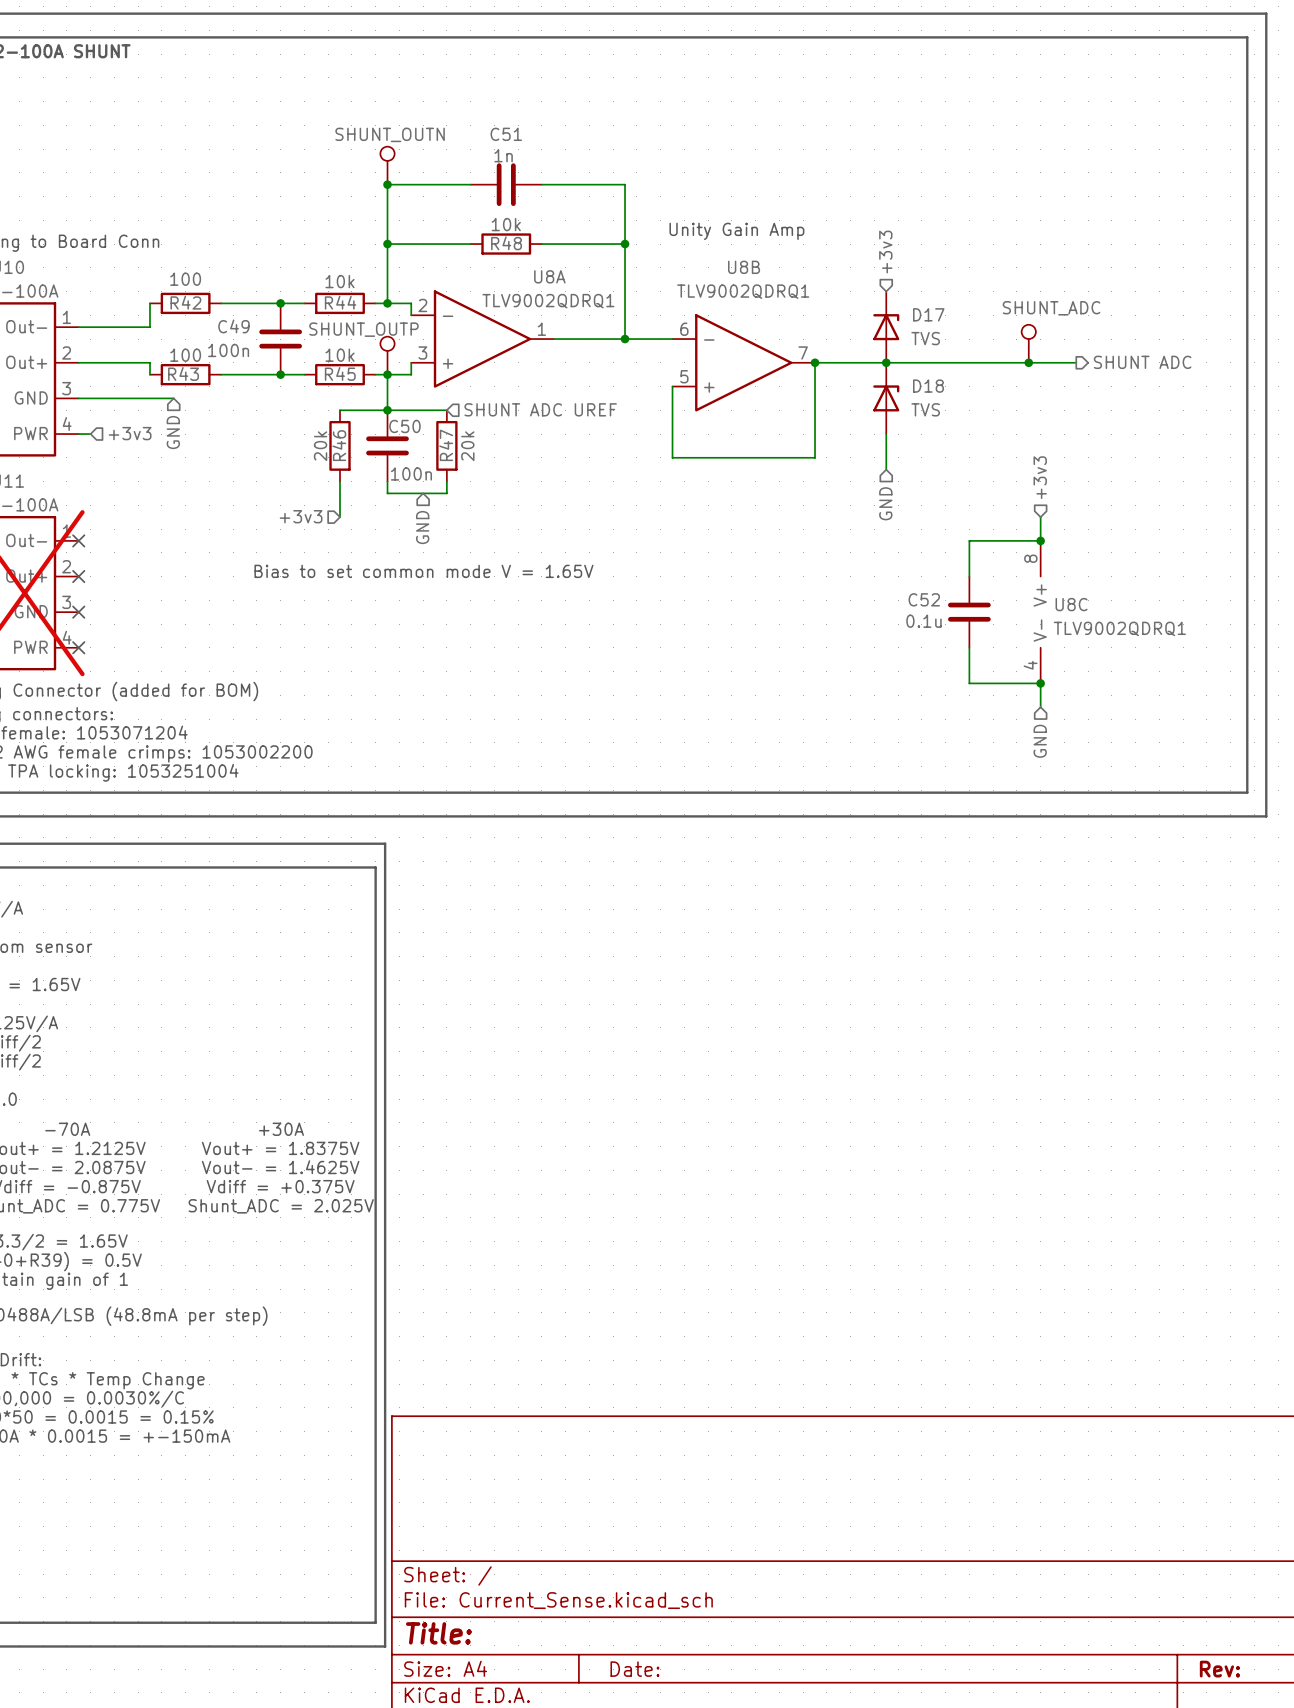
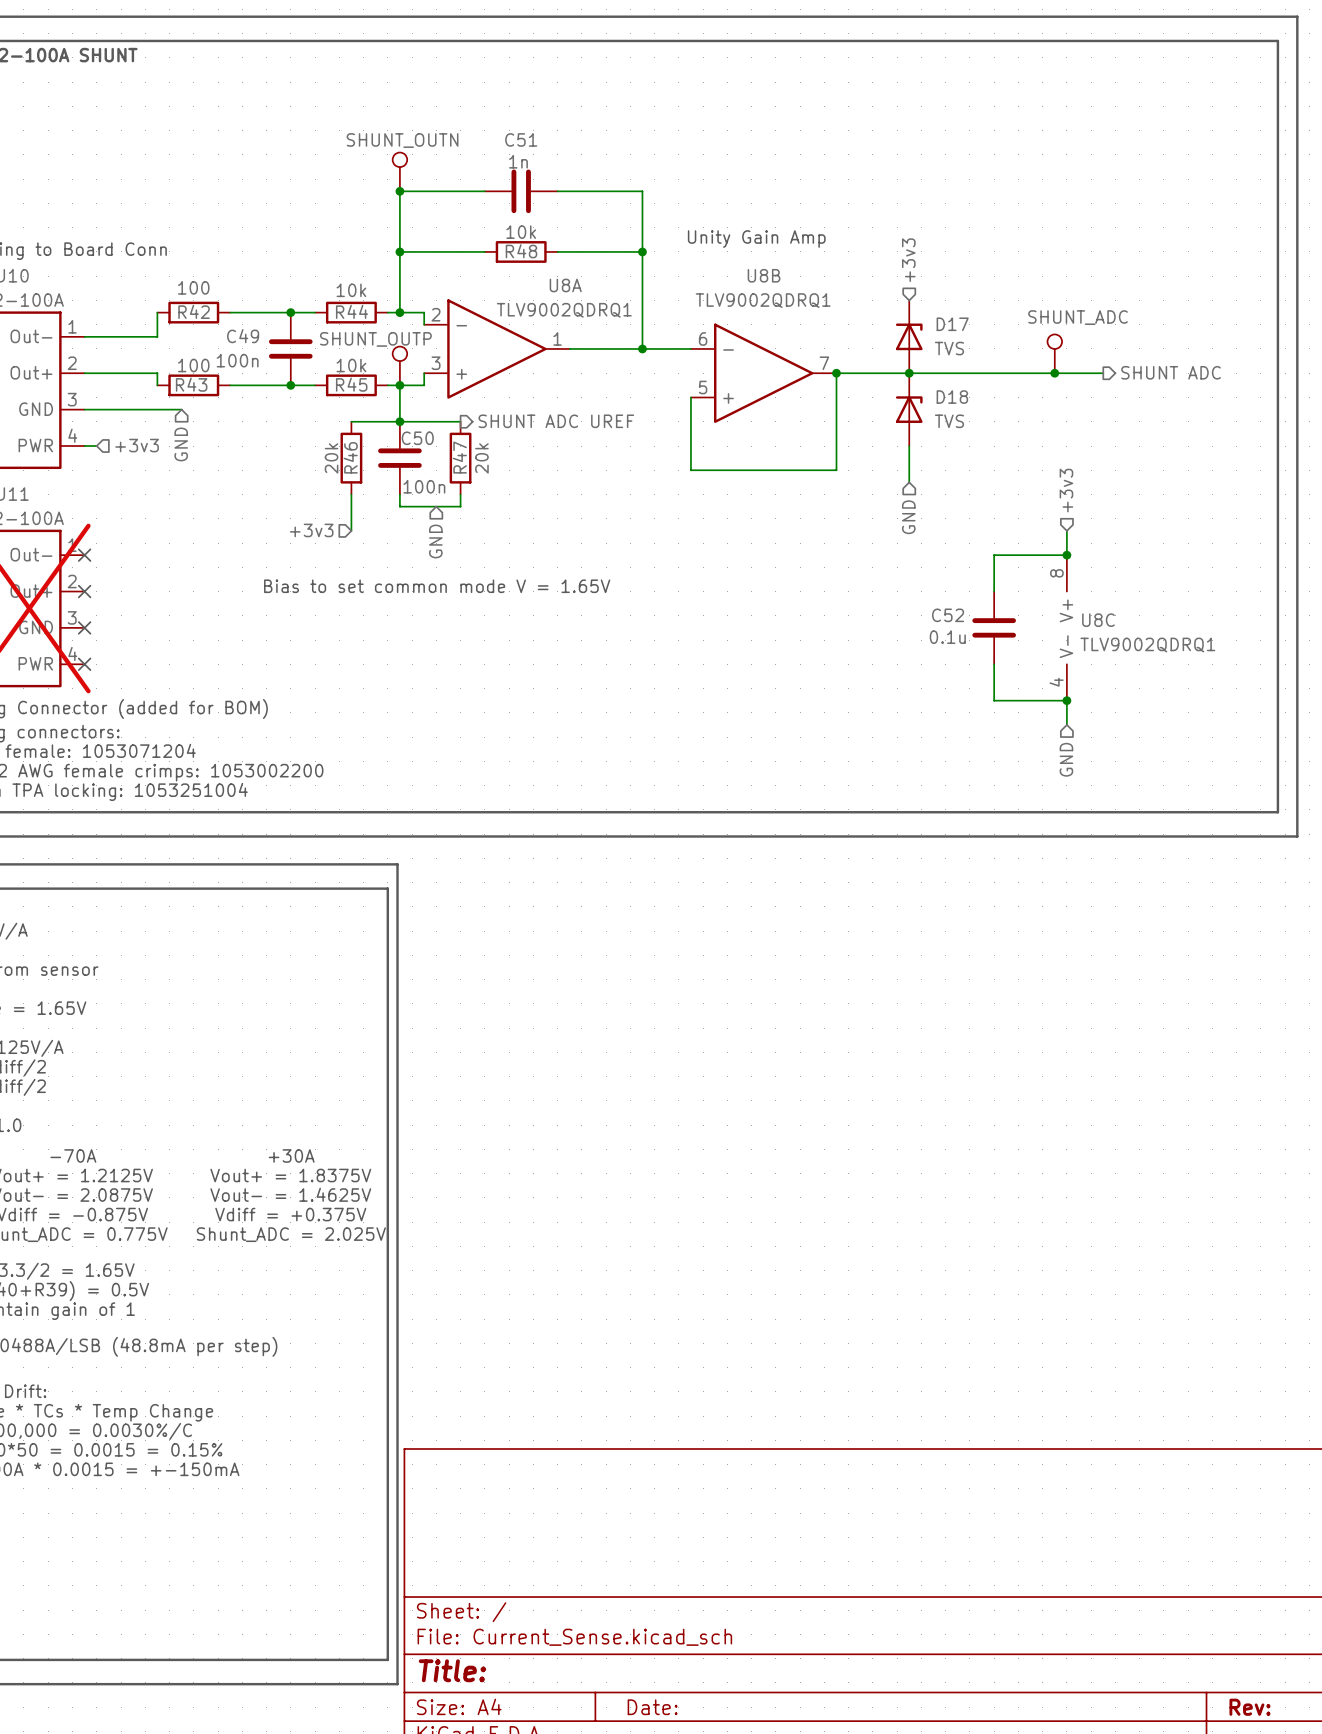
hierarchical label shape: input (540, 409) -> output (556, 421)

